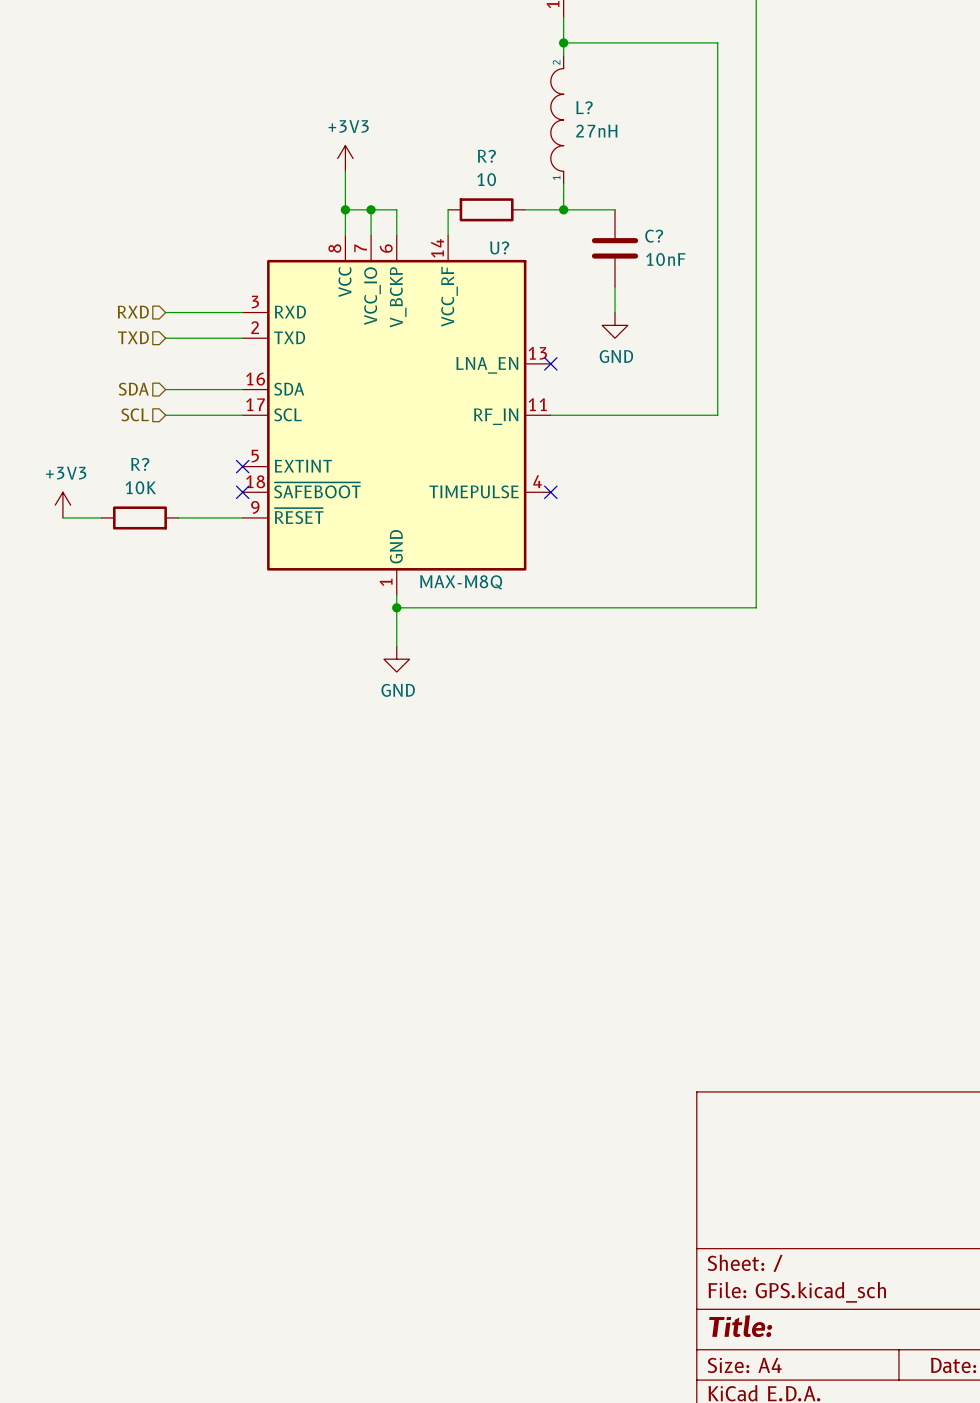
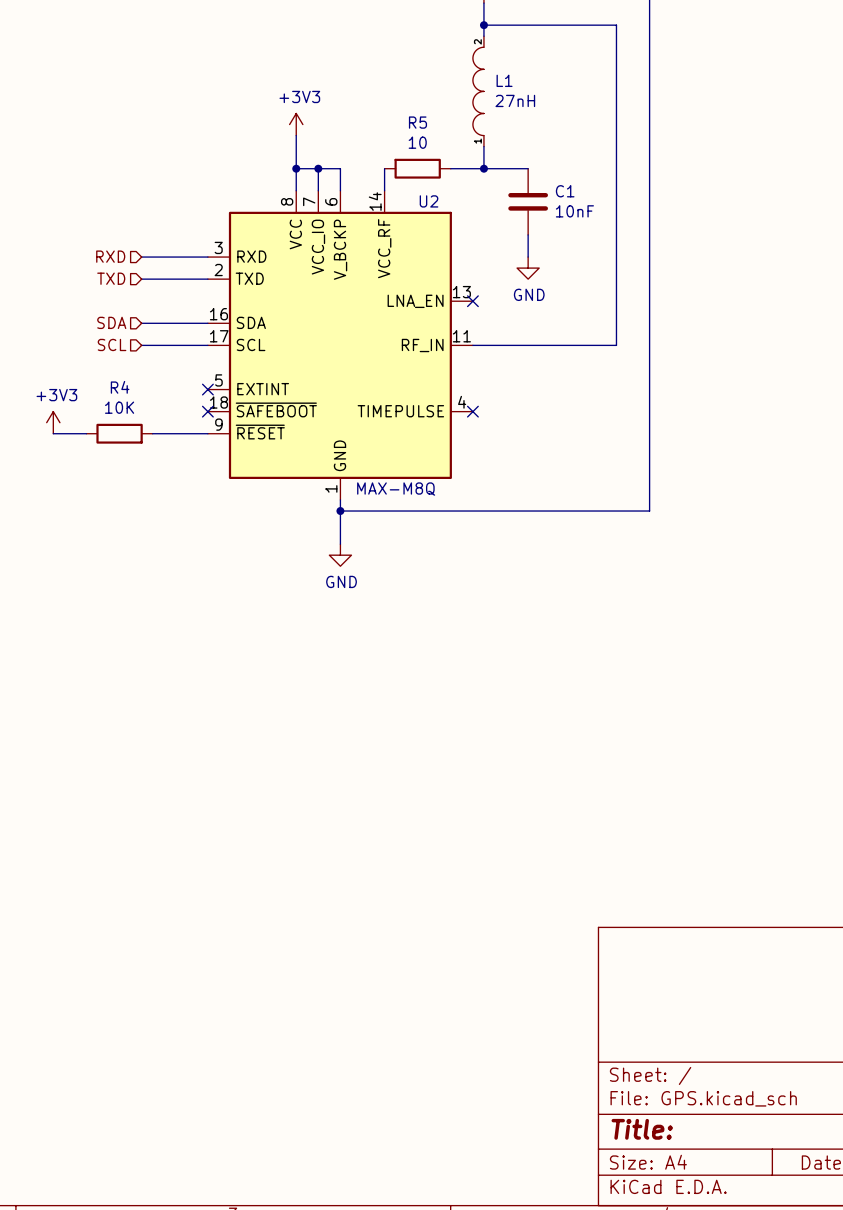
L? name: L? (584, 107) -> L1 (504, 80)
R? name: R? (486, 156) -> R5 (417, 122)
C? name: C? (654, 236) -> C1 (565, 191)
U? name: U? (499, 247) -> U2 (429, 201)
R? name: R? (140, 464) -> R4 (120, 387)

